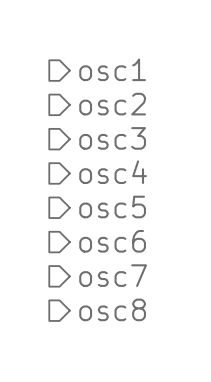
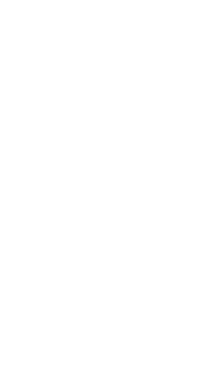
hierarchical label: osc1 (112, 69) -> none
hierarchical label: osc2 (112, 104) -> none
hierarchical label: osc3 (112, 138) -> none
hierarchical label: osc4 (113, 172) -> none
hierarchical label: osc5 (112, 207) -> none
hierarchical label: osc6 (112, 241) -> none
hierarchical label: osc7 (113, 275) -> none
hierarchical label: osc8 (112, 309) -> none

